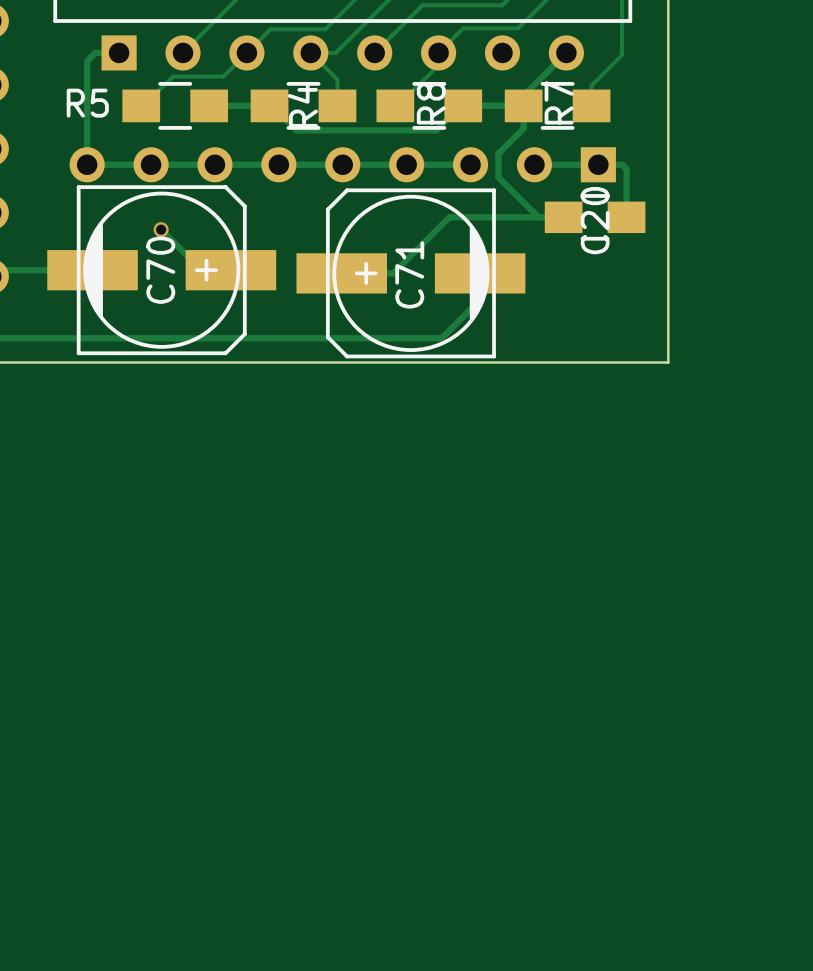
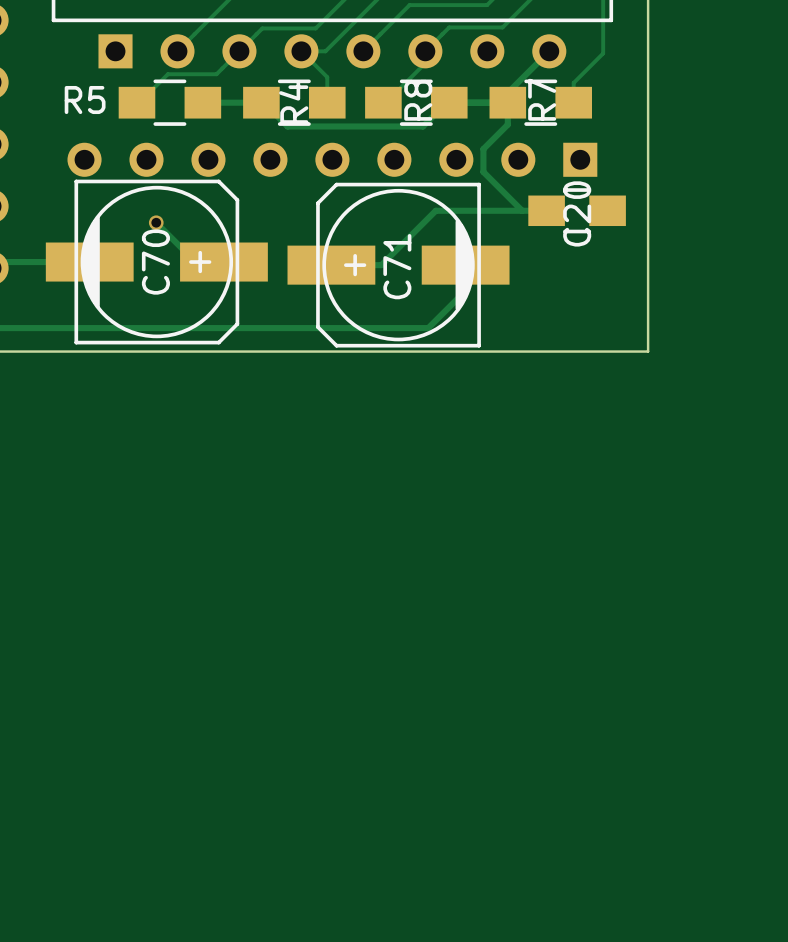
track: (119, 52) (95, 52) (87, 61) (87, 164) (470, 164) -> none
track: (534, 164) (622, 164) (626, 169) (626, 217) -> none

